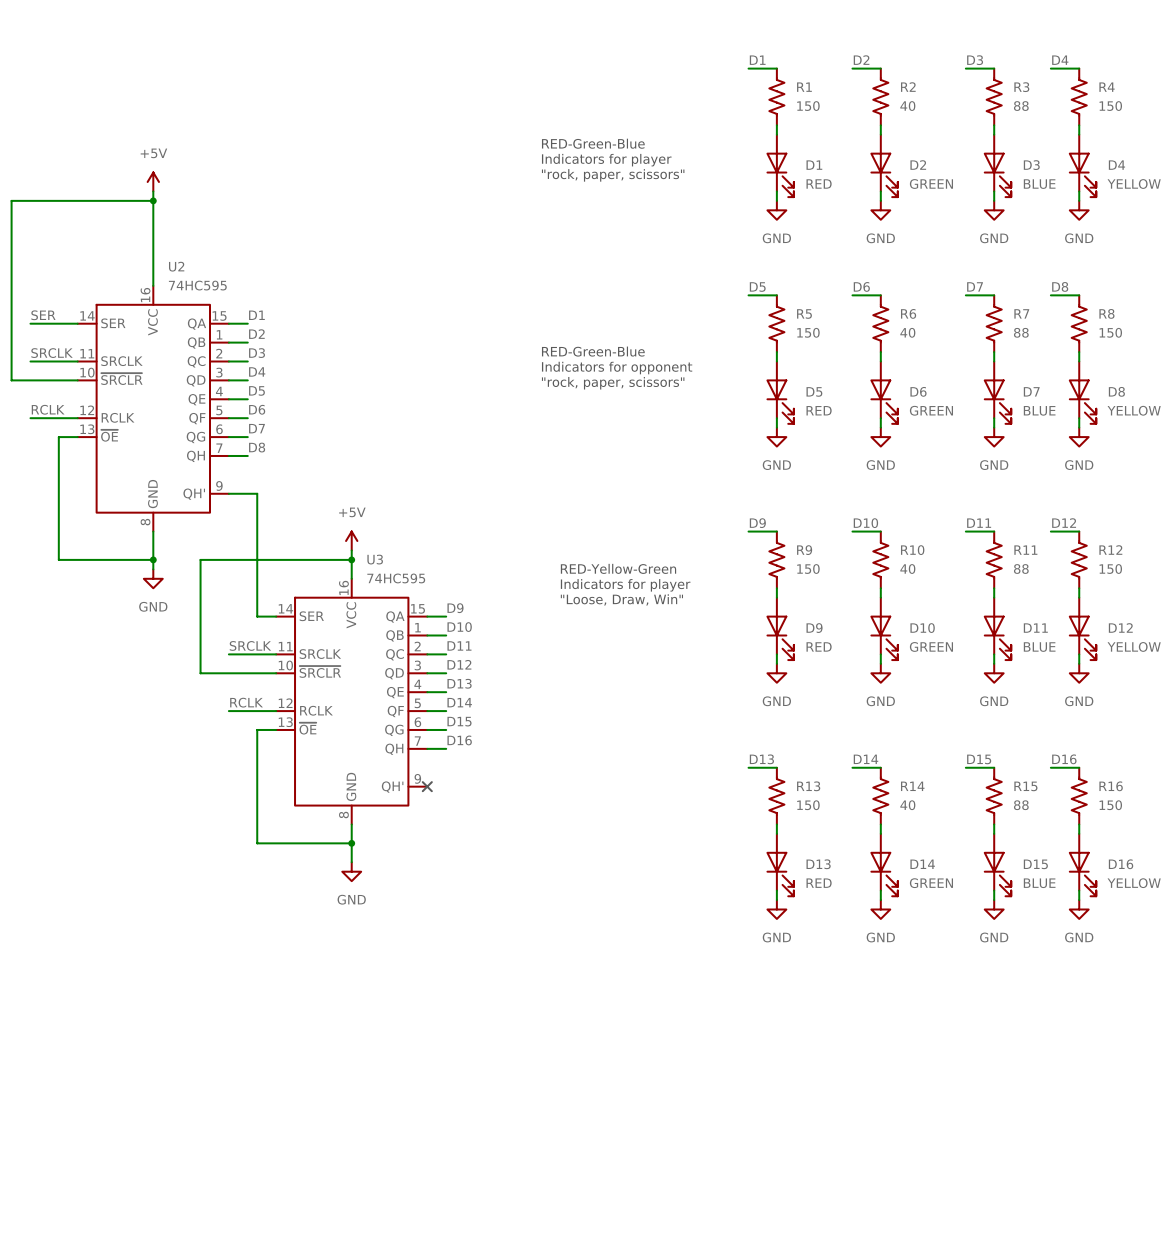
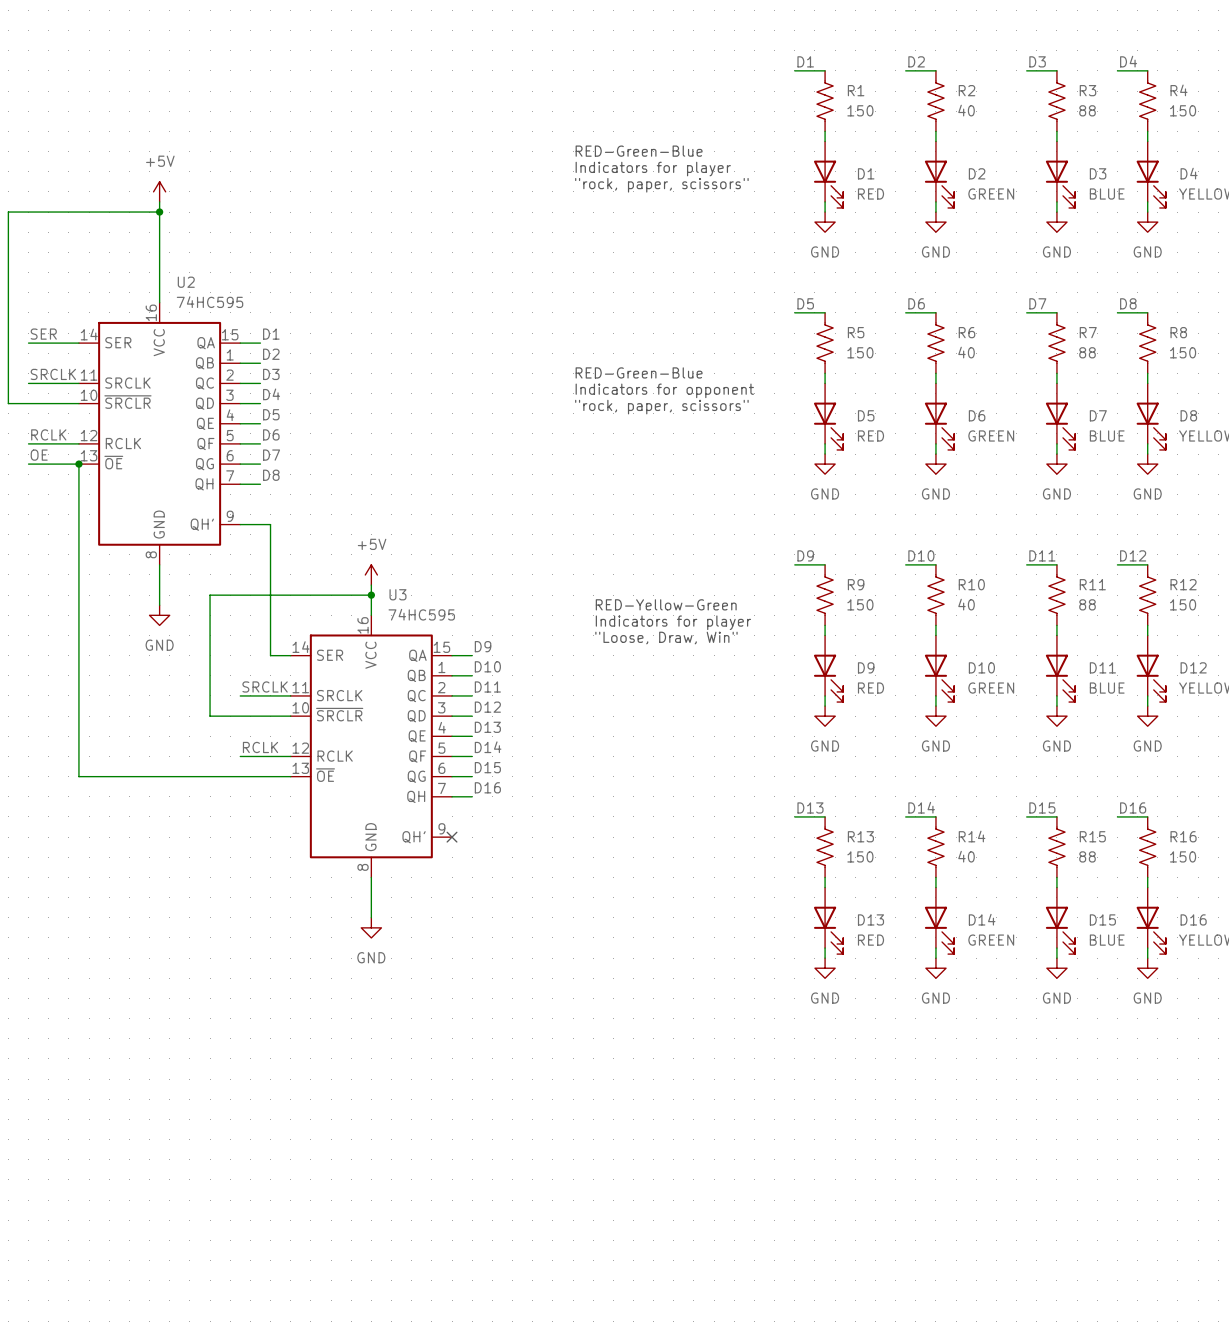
label: none -> OE (39, 455)
wire: (58, 437) (58, 559) (153, 559) -> (58, 464) (28, 464)
junction: none -> (78, 464)
junction: (153, 559) -> none
wire: (257, 729) (257, 843) (351, 843) -> (270, 776) (78, 776) (78, 464)
junction: (351, 843) -> none

